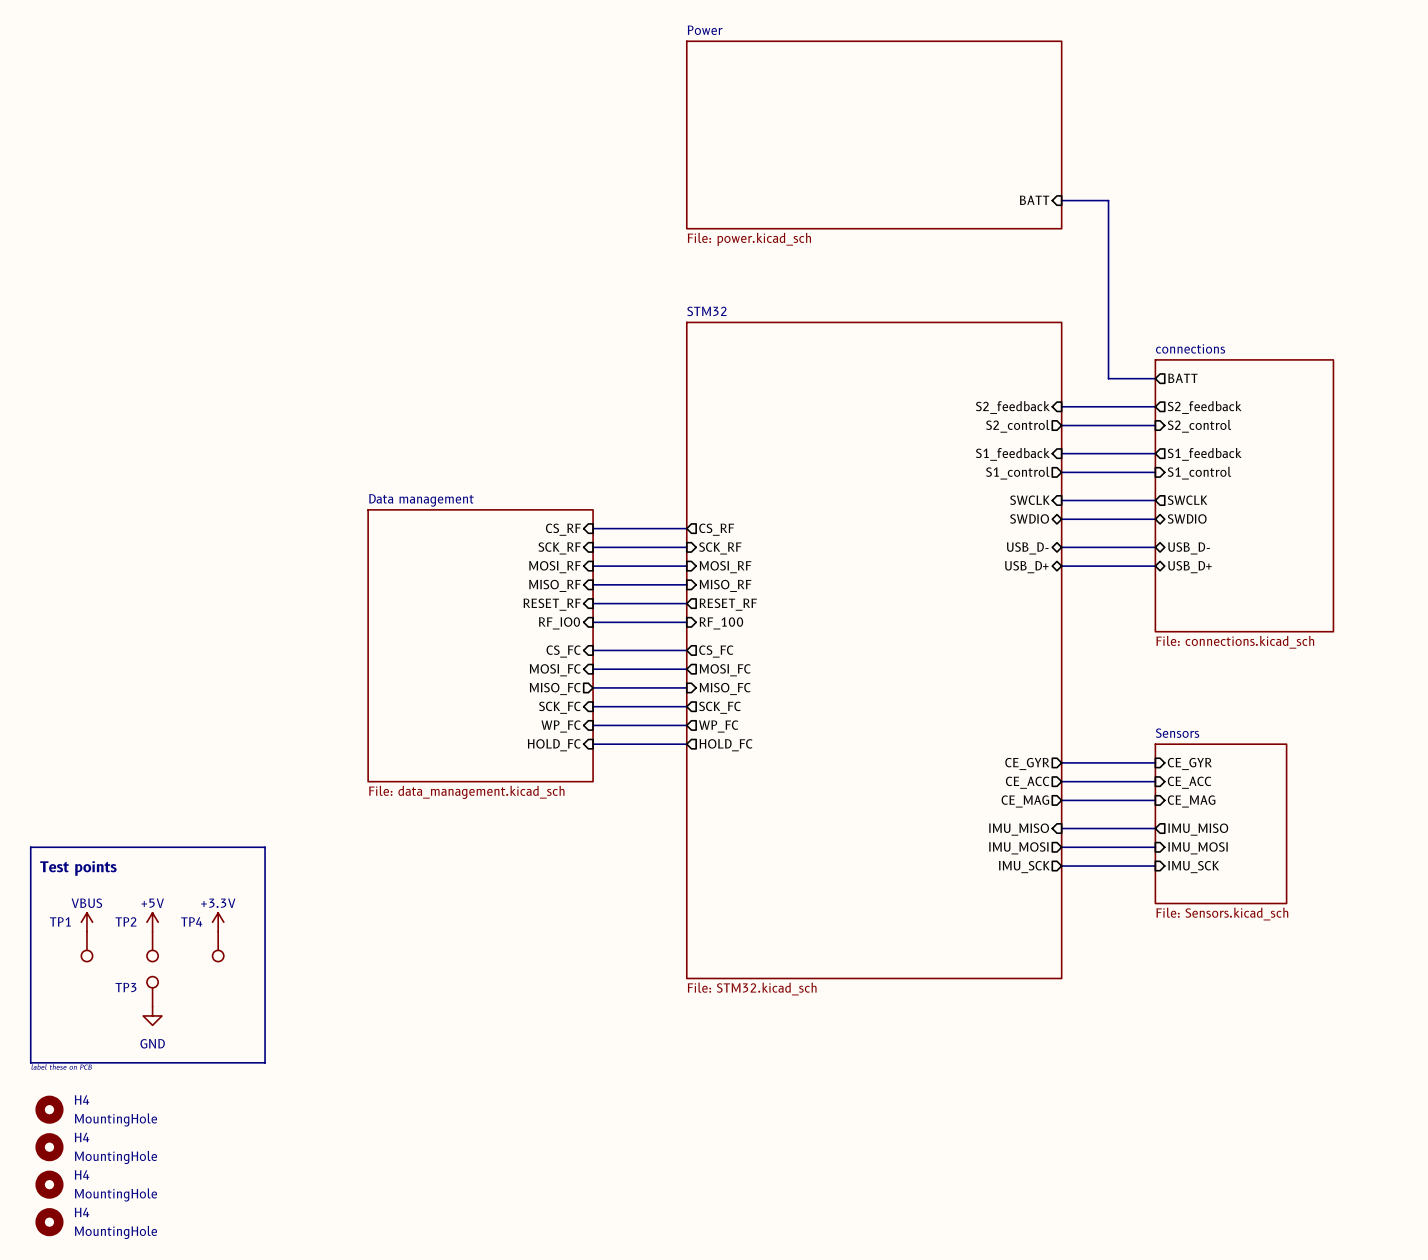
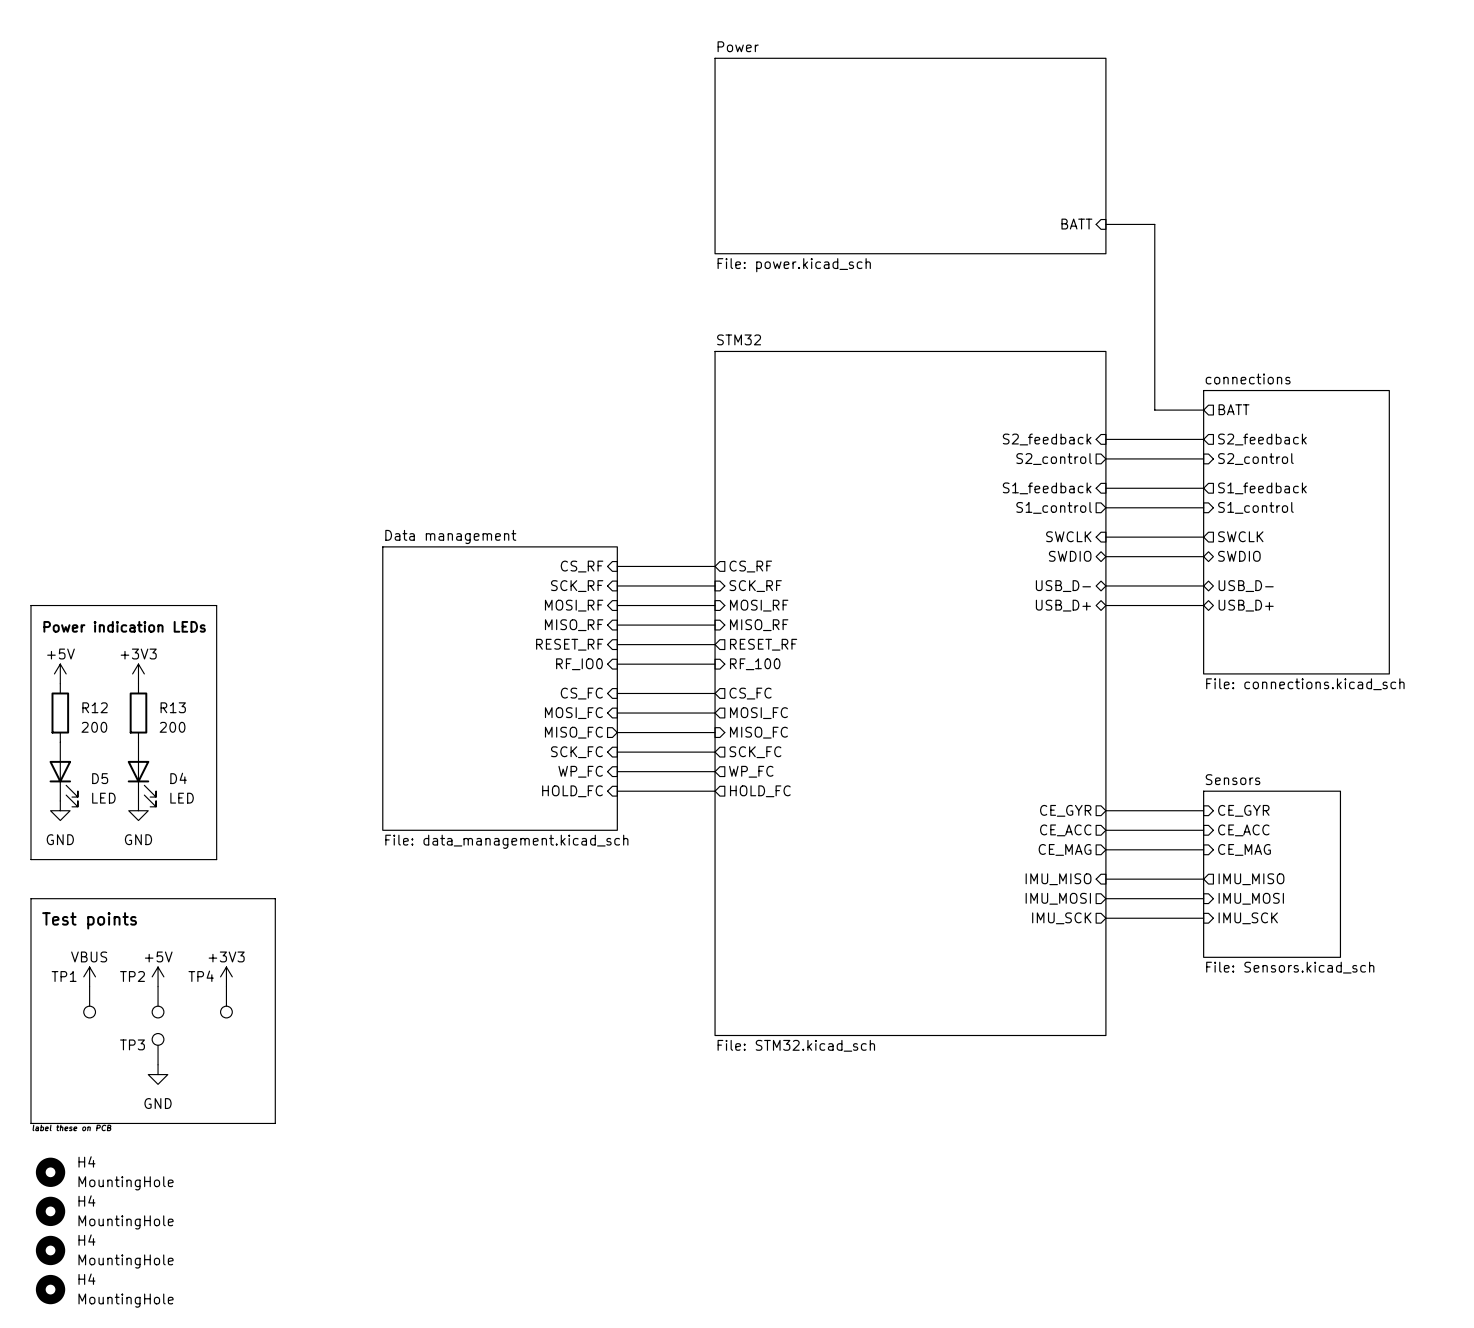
line: none -> (30, 605) (216, 605) (216, 859) (30, 859) (30, 605)
text: none -> Power indication LEDs (124, 626)
power symbol: none -> +5V (60, 673)
power symbol: none -> +3V3 (138, 673)
R12: none -> 200 (60, 713)
R13: none -> 200 (138, 713)
D5: none -> LED (63, 774)
D4: none -> LED (141, 774)
power symbol: none -> GND (60, 810)
power symbol: none -> GND (138, 810)
power symbol: +3.3V (218, 922) -> +3V3 (226, 976)

